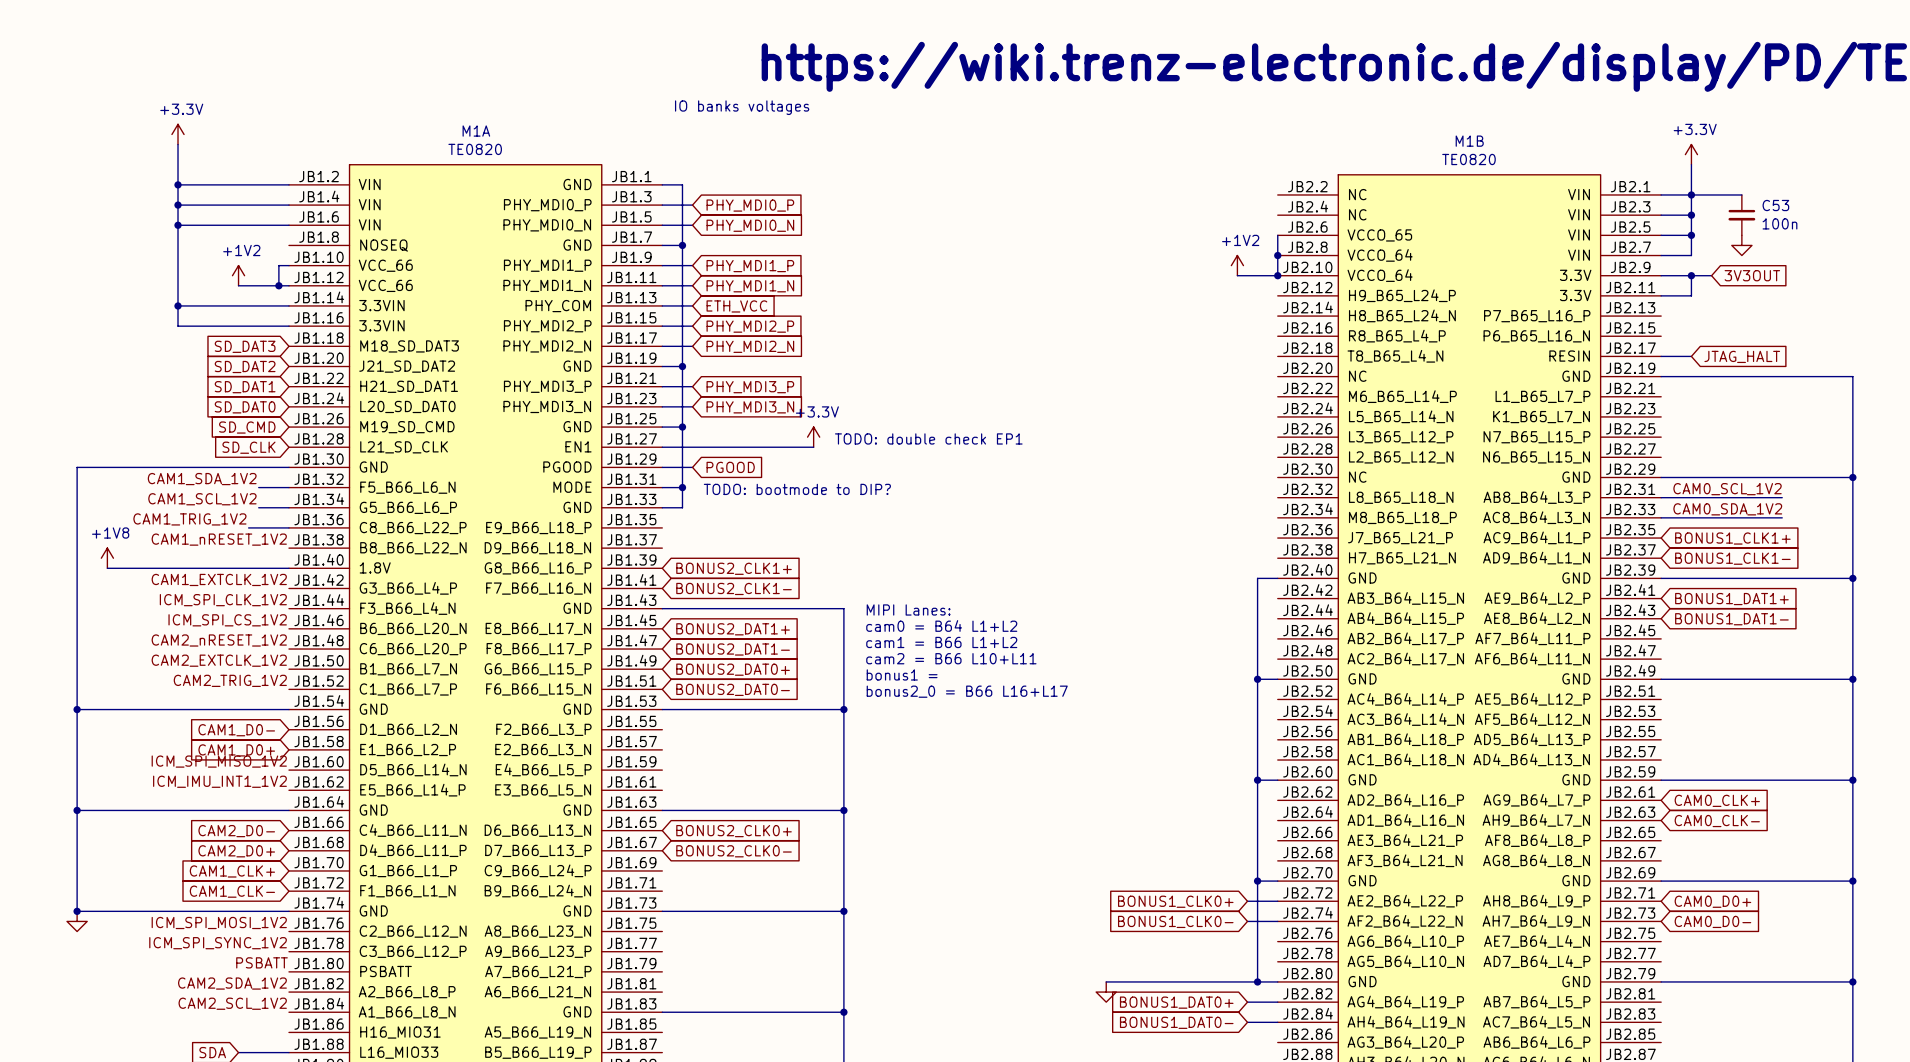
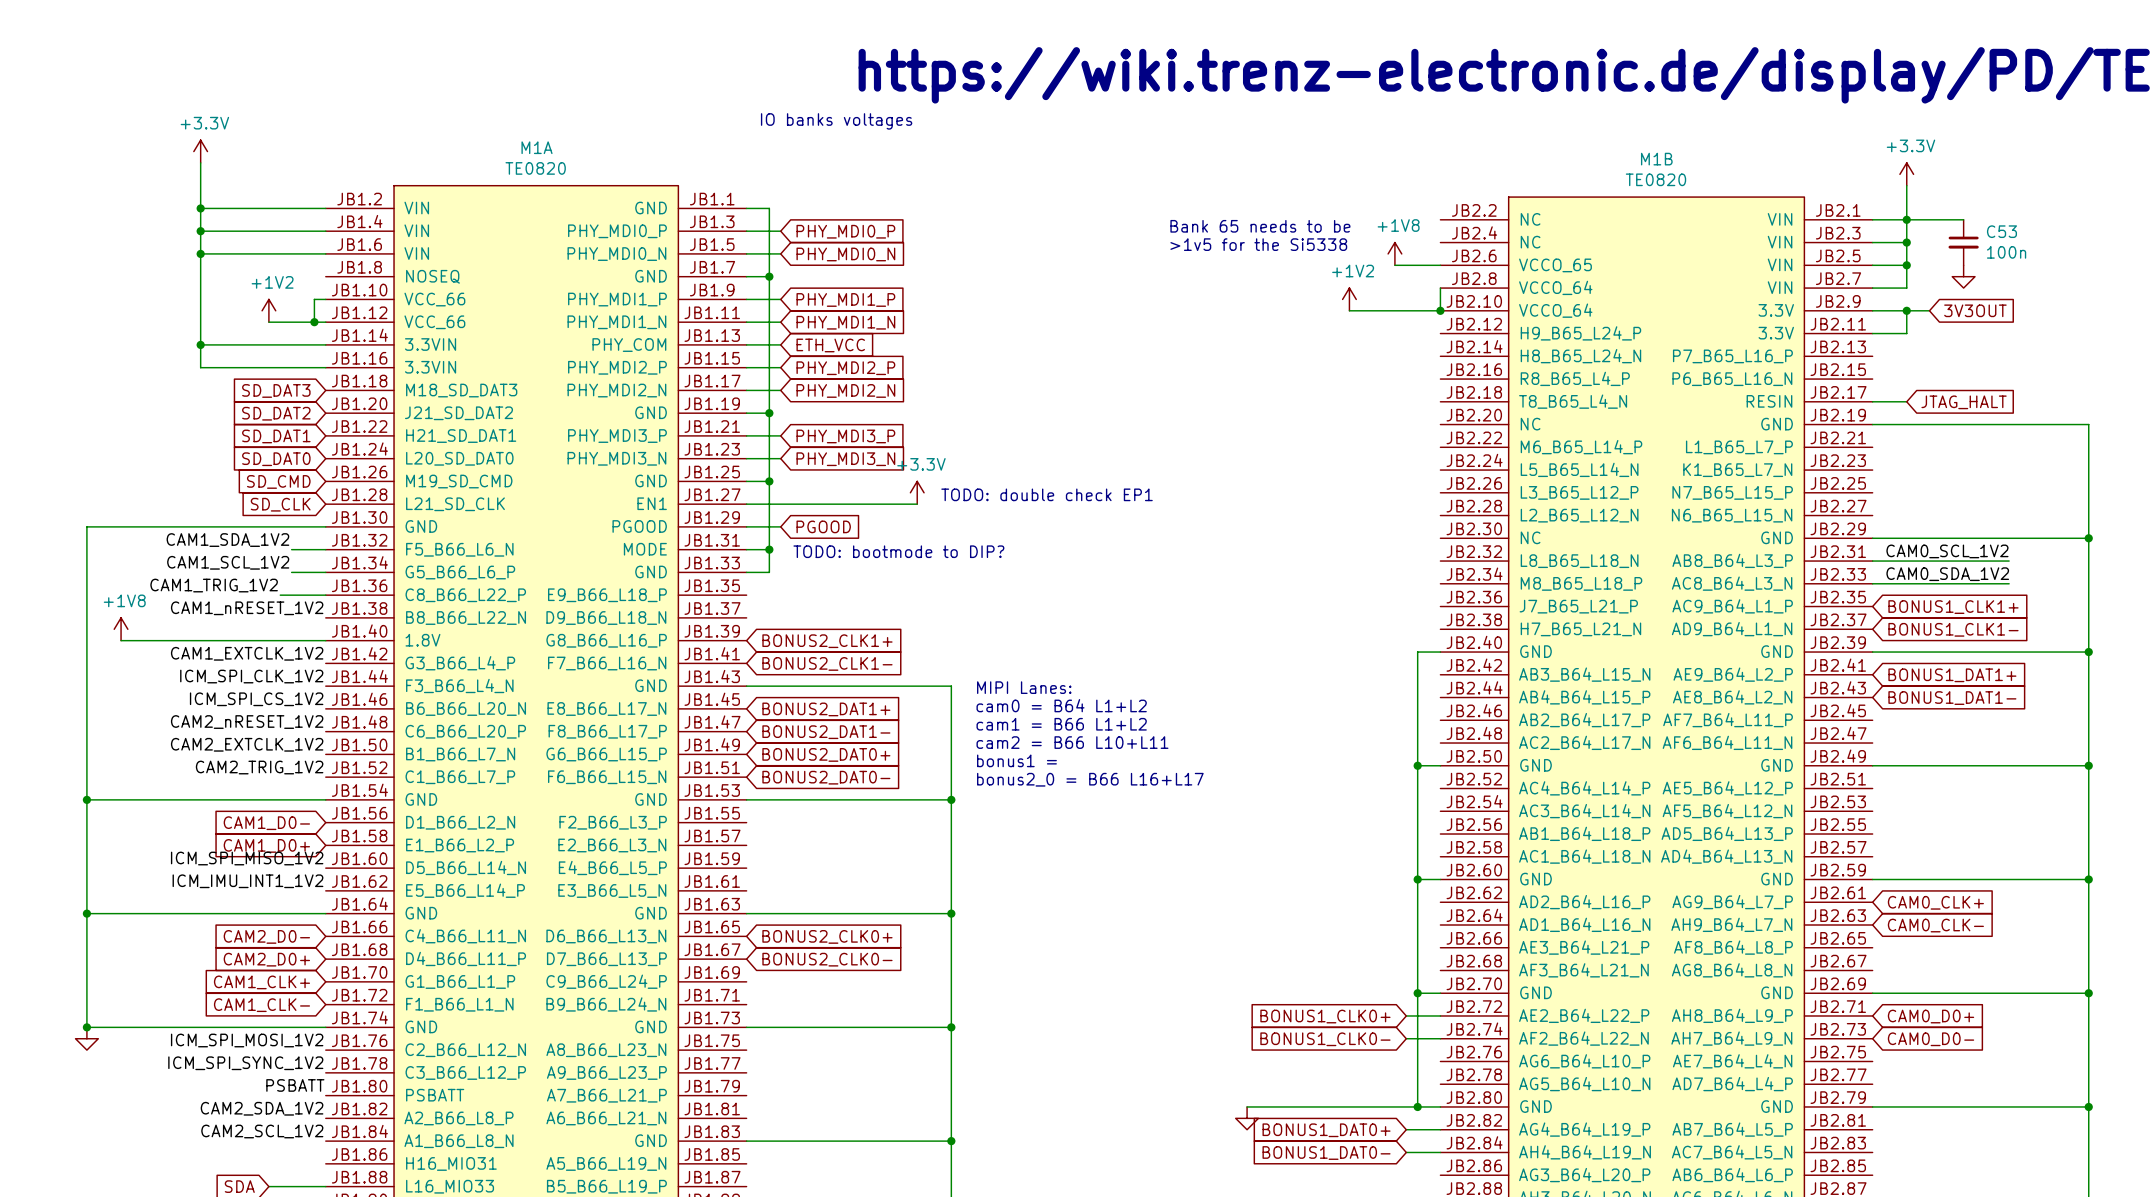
text: none -> Bank 65 needs to be (1260, 226)
text: none -> >1v5 for the Si5338 (1258, 244)
power symbol: none -> +1V8 (1394, 253)
wire: (1277, 235) (1277, 255) -> (1440, 265) (1394, 265)
junction: (1277, 255) -> none
power symbol position: +1V2 (1237, 265) -> +1V2 (1349, 299)
wire: none -> (1349, 310) (1394, 310)

